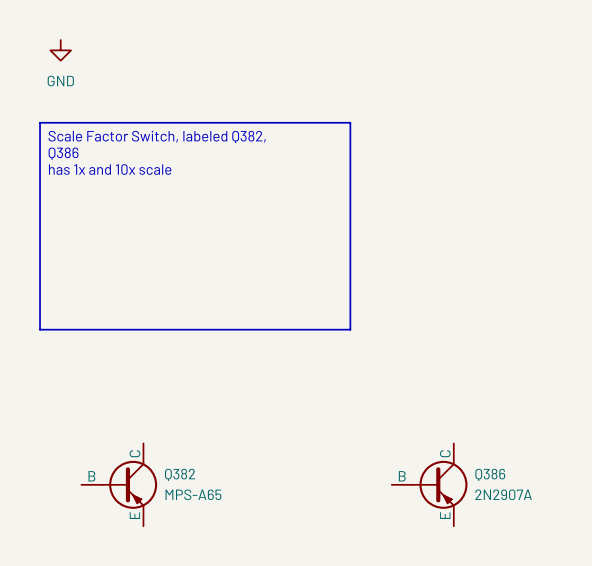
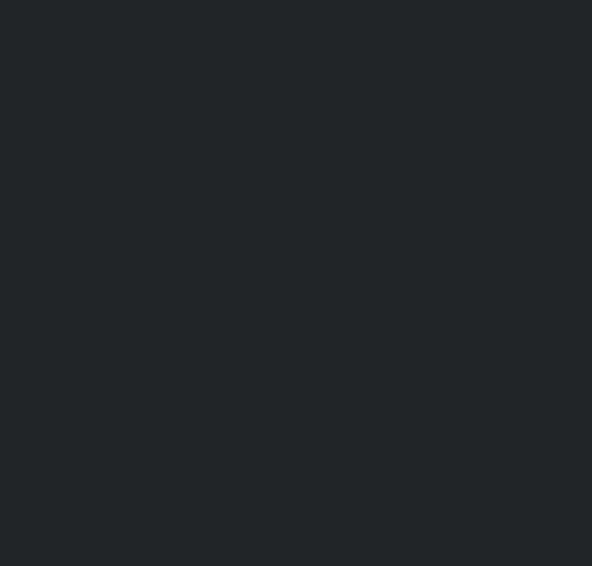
power symbol: GND (60, 50) -> none
line: (40, 122) (350, 122) (350, 329) (40, 329) (40, 122) -> none
text: Scale Factor Switch, labeled Q382, (157, 136) -> none
text: Q386 (63, 153) -> none
text: has 1x and 10x scale (110, 169) -> none
Q382: MPS-A65 (119, 484) -> none
Q386: 2N2907A (429, 484) -> none

